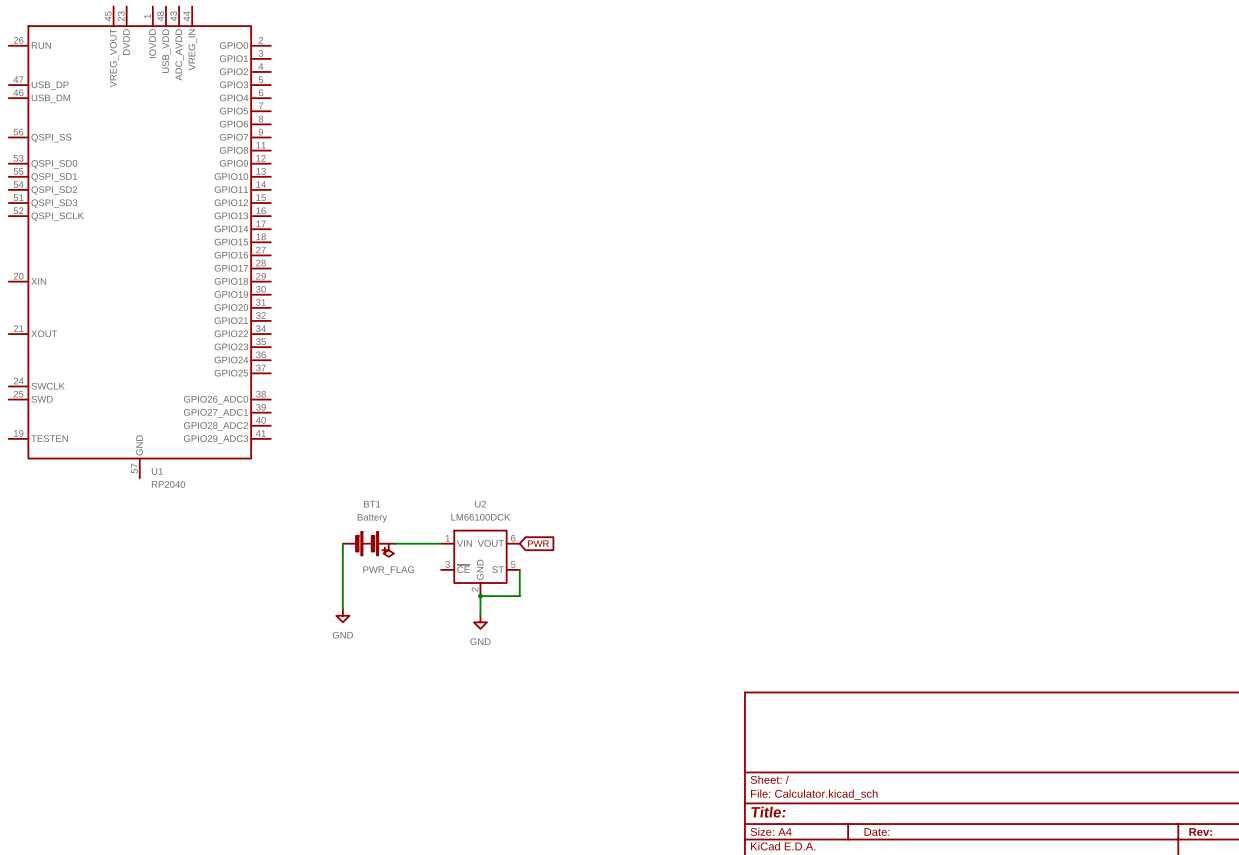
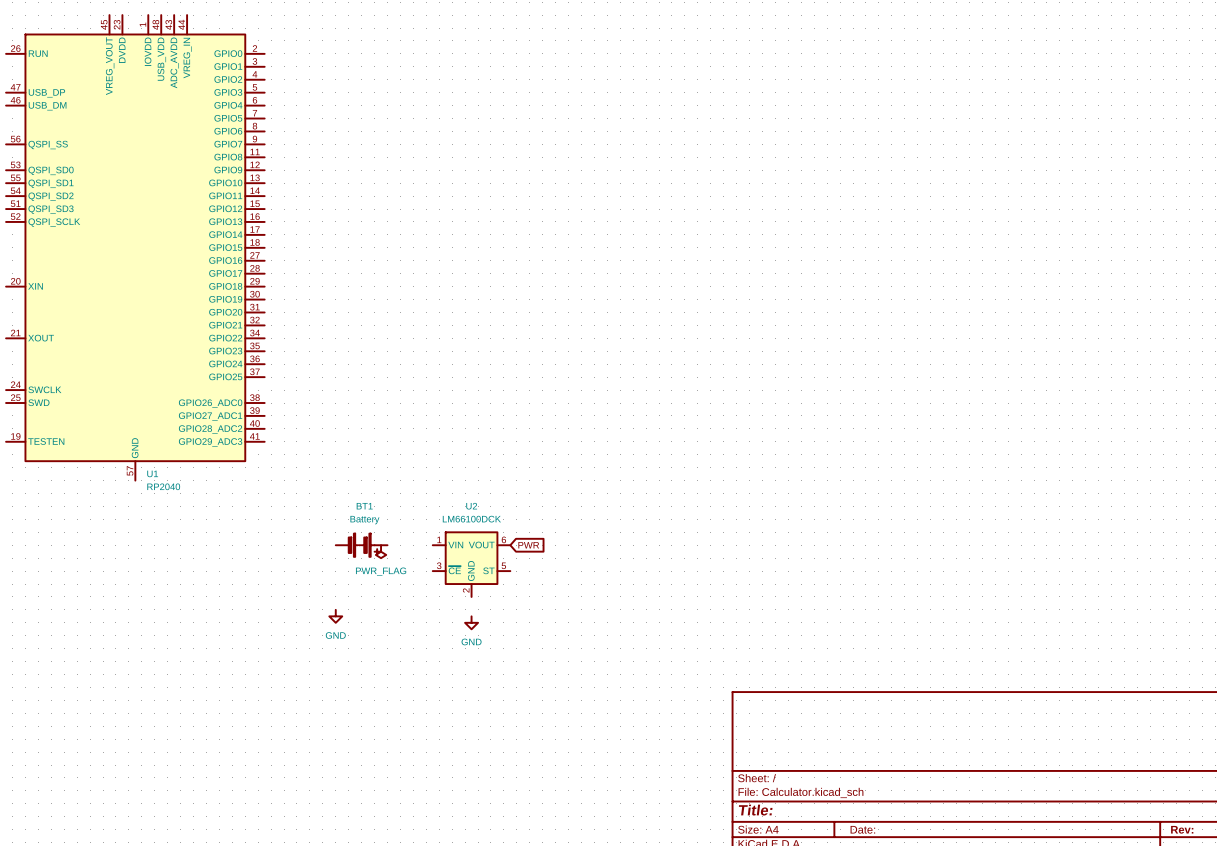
wire: (342, 543) (342, 609) -> none
wire: (395, 543) (441, 543) -> none
wire: (519, 569) (519, 596) (480, 596) (480, 615) -> none
junction: (480, 596) -> none

